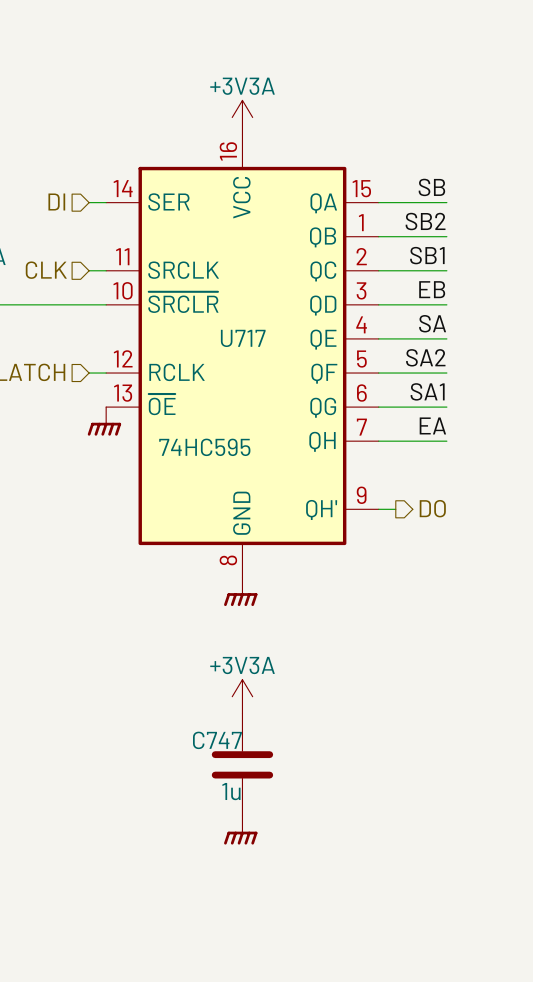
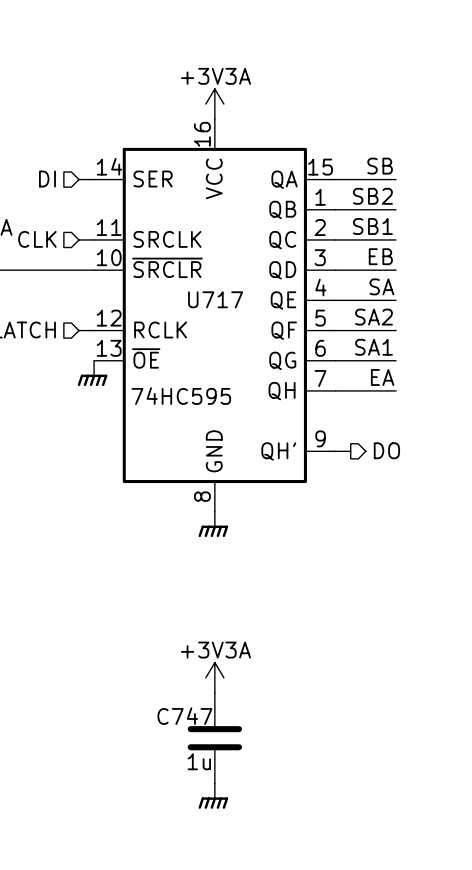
power symbol position: +3V3A (242, 696) -> +3V3A (214, 677)
C747 position: (242, 764) -> (214, 738)
power symbol position: (240, 830) -> (213, 796)

